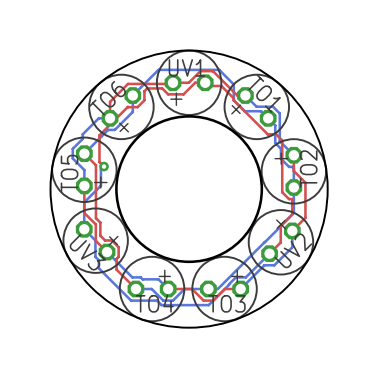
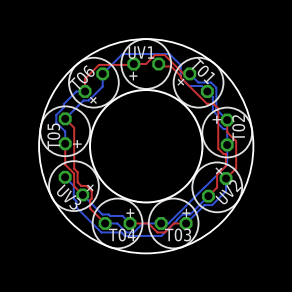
top track: (205, 82) (195, 82) (183, 94) (168, 94) (162, 88) (147, 88) (144, 91) (144, 100) (137, 107) (128, 107) -> none
top track: (127, 106) (99, 135) (99, 162) (103, 166) -> none
bottom track: (103, 166) (100, 169) (100, 185) (84, 202) (84, 229) -> none
via: (103, 166) -> none

